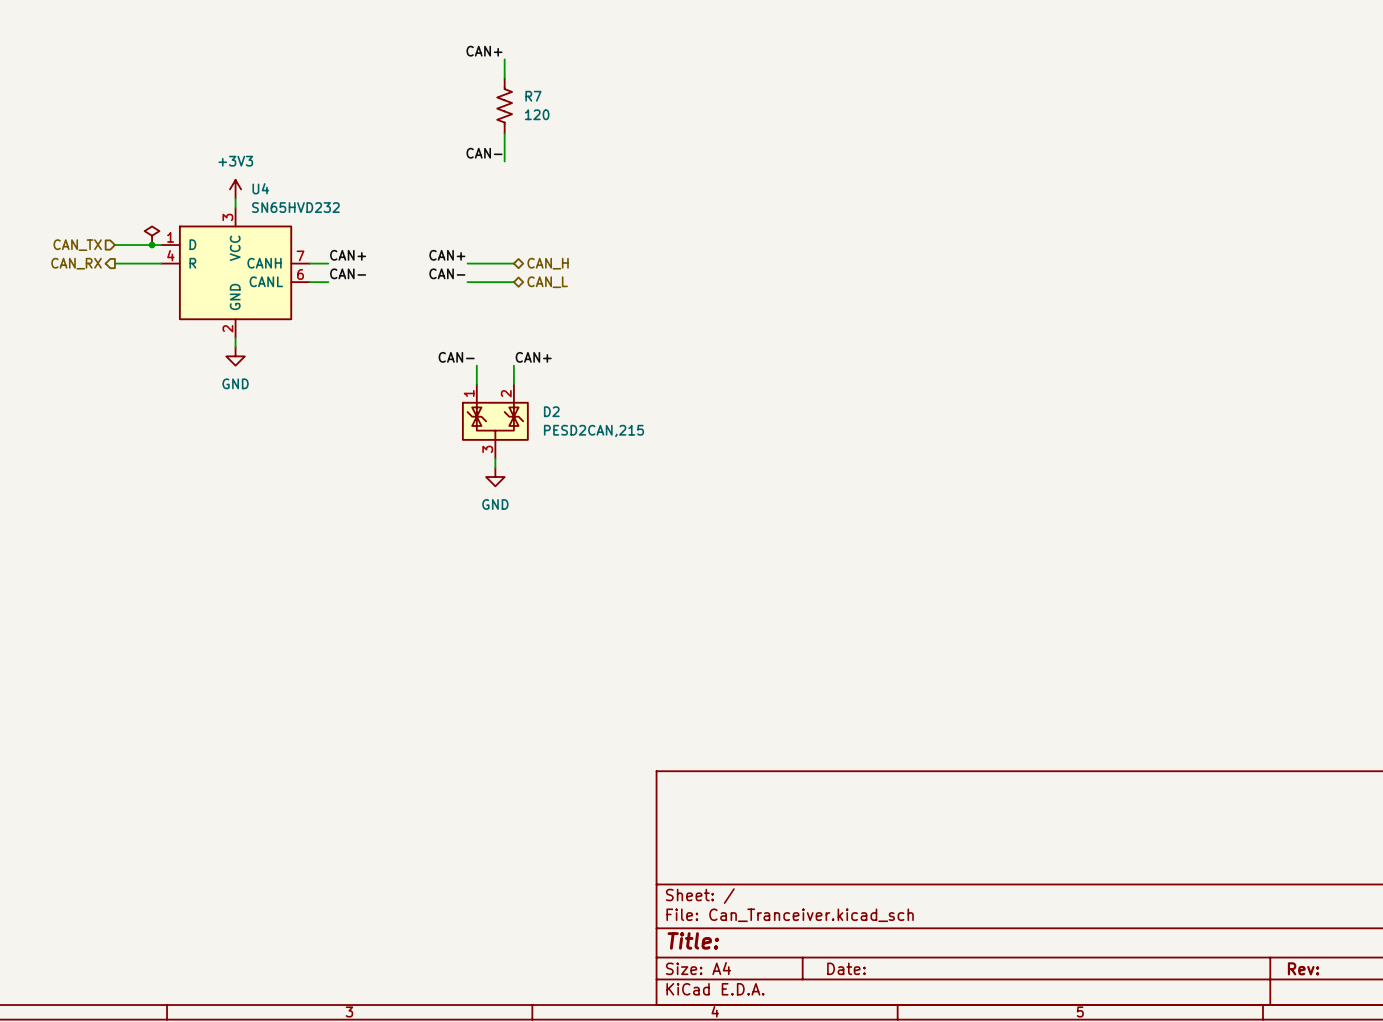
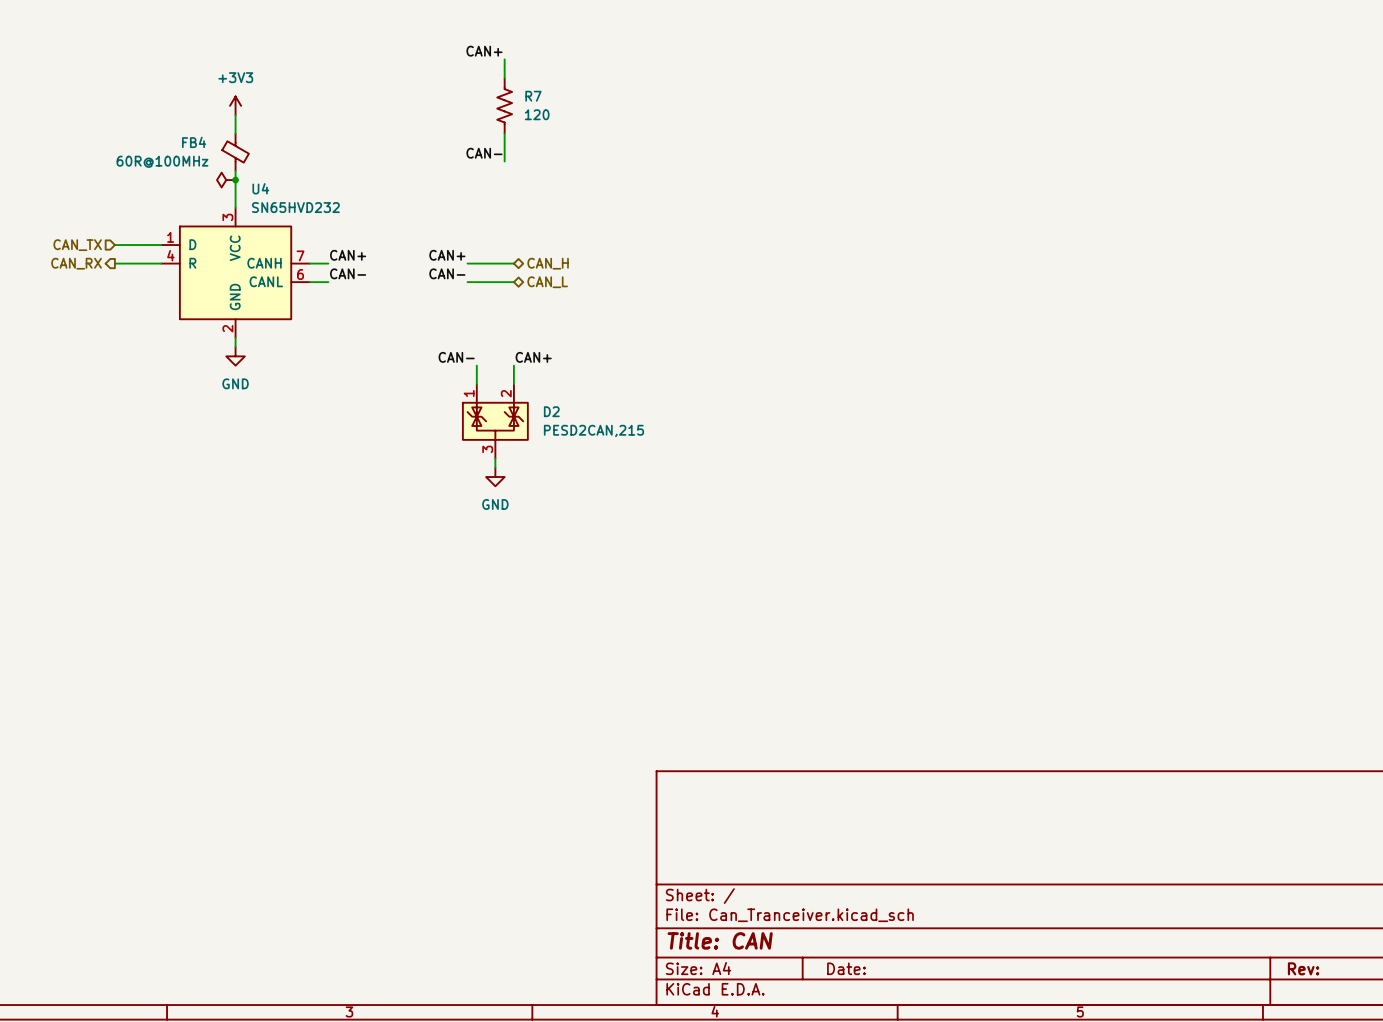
wire: none -> (235, 115) (235, 133)
FB4: none -> 60R@100MHz (235, 152)
junction: none -> (235, 180)
power symbol position: +3V3 (235, 189) -> +3V3 (235, 105)
power symbol rotation: 0° (152, 235) -> 90° counterclockwise (226, 180)
power symbol position: (152, 235) -> (226, 180)
junction: (152, 245) -> none
title block: Title: (693, 940) -> Title: CAN (720, 940)

